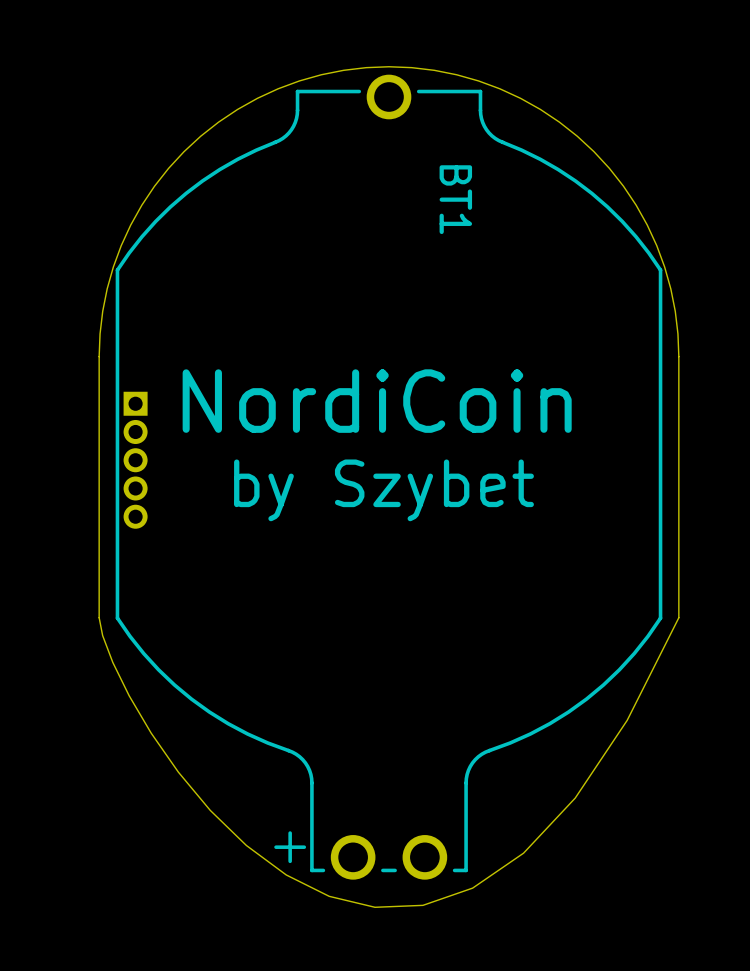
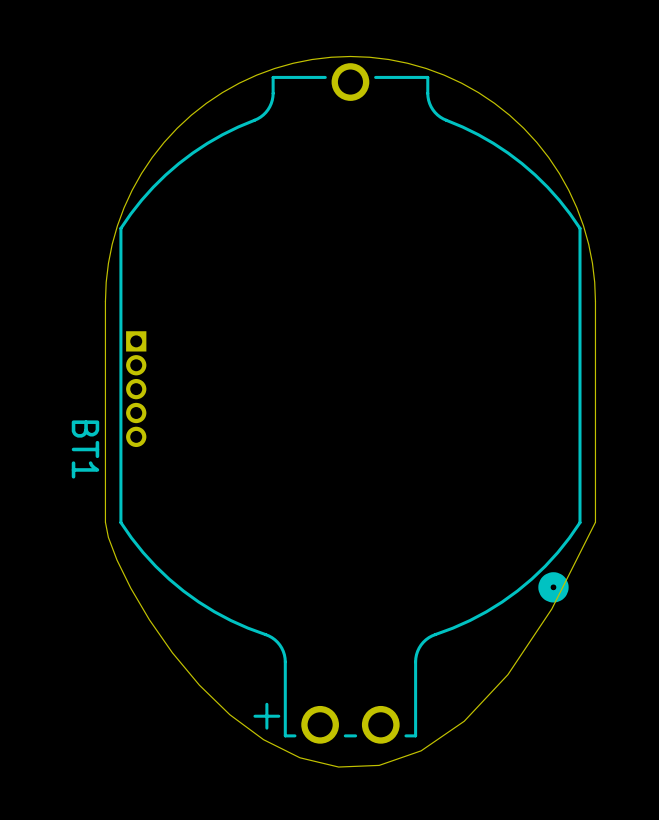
BT1 name position: BT1 (455, 199) -> BT1 (85, 449)
text: NordiCoin (377, 401) -> none
text: by Szybet (383, 490) -> none
part: none -> (553, 587)

